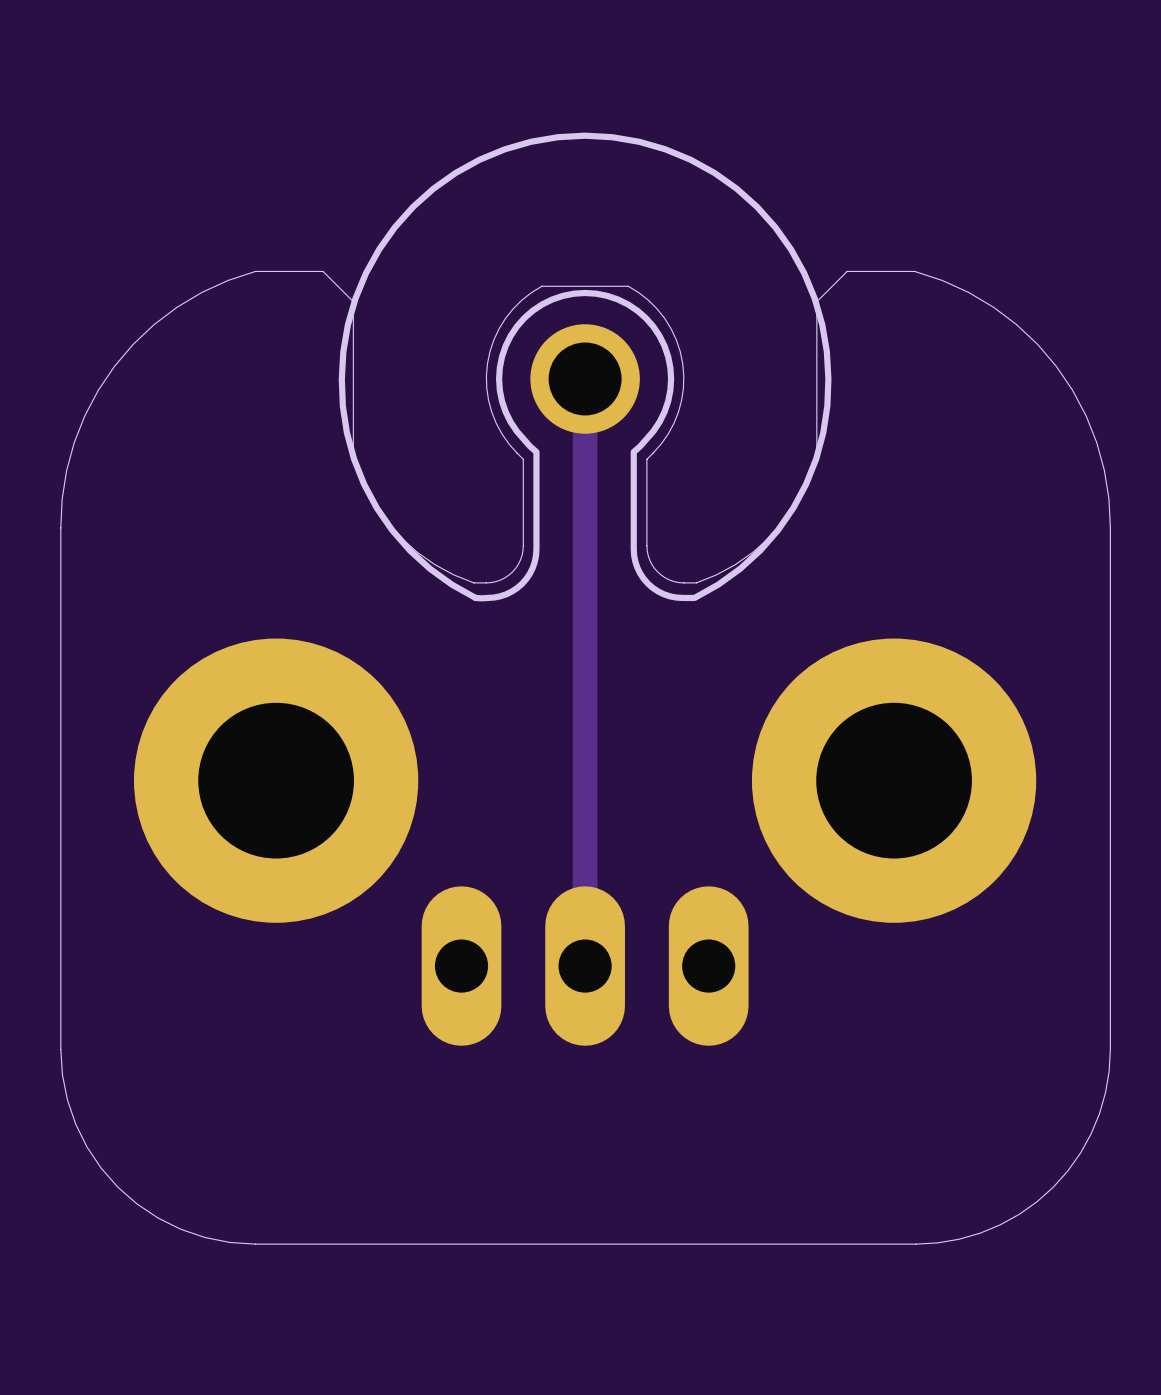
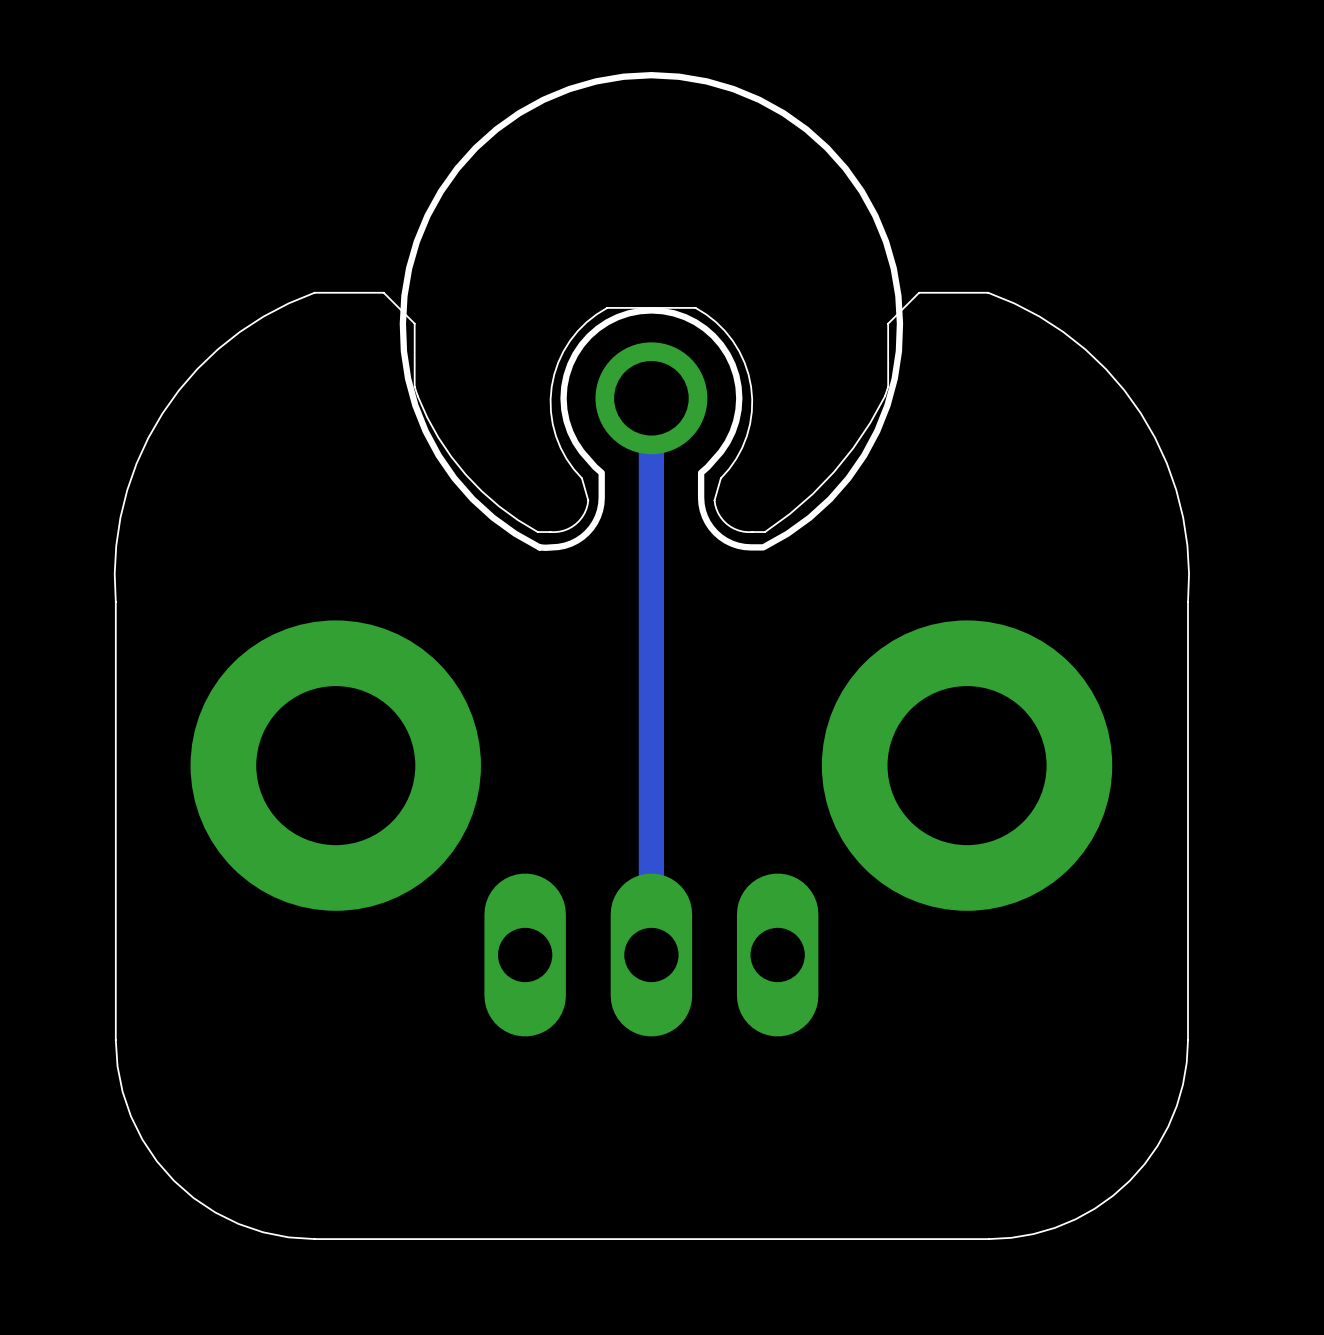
part footprint: [338, 132, 832, 602] -> [399, 72, 904, 551]
board edge: (353, 348) (353, 301) (323, 271) (255, 271) (228, 280) (201, 292) (177, 307) (154, 324) (133, 344) (114, 366) (98, 390) (84, 415) (74, 442) (66, 470) (62, 499) (60, 620) -> (414, 323) (383, 292) (314, 292) (263, 316) (217, 349) (178, 390) (148, 437) (136, 463) (120, 517) (114, 573) (115, 602)
board edge: (816, 348) (816, 301) (847, 271) (914, 271) (942, 280) (968, 292) (993, 307) (1016, 324) (1037, 344) (1056, 366) (1072, 390) (1086, 415) (1096, 442) (1104, 470) (1108, 499) (1110, 620) -> (888, 323) (919, 292) (988, 292) (1039, 316) (1085, 349) (1124, 390) (1155, 437) (1166, 463) (1183, 517) (1189, 573) (1188, 602)
board edge: (816, 409) (816, 456) (805, 485) (795, 504) (768, 538) (752, 552) (735, 564) (696, 582) (679, 582) (665, 577) (654, 568) (648, 555) (646, 459) (661, 444) (674, 423) (681, 400) (683, 375) (680, 351) (671, 328) (657, 308) (628, 286) (541, 286) (513, 308) (493, 339) (487, 363) (488, 400) (501, 433) (523, 459) (522, 550) (515, 568) (500, 580) (491, 582) (473, 582) (453, 574) (417, 552) (387, 522) (364, 485) (353, 456) (353, 409) -> (888, 386) (870, 423) (853, 448) (812, 494) (765, 532) (747, 532) (734, 528) (723, 520) (716, 509) (714, 500) (720, 478) (736, 458) (746, 436) (752, 399) (748, 374) (739, 351) (724, 330) (695, 307) (607, 307) (577, 330) (563, 351) (551, 386) (552, 424) (566, 458) (581, 478) (588, 500) (586, 509) (579, 520) (563, 530) (537, 532) (499, 506) (481, 491) (451, 456) (438, 437) (427, 417) (414, 386)

